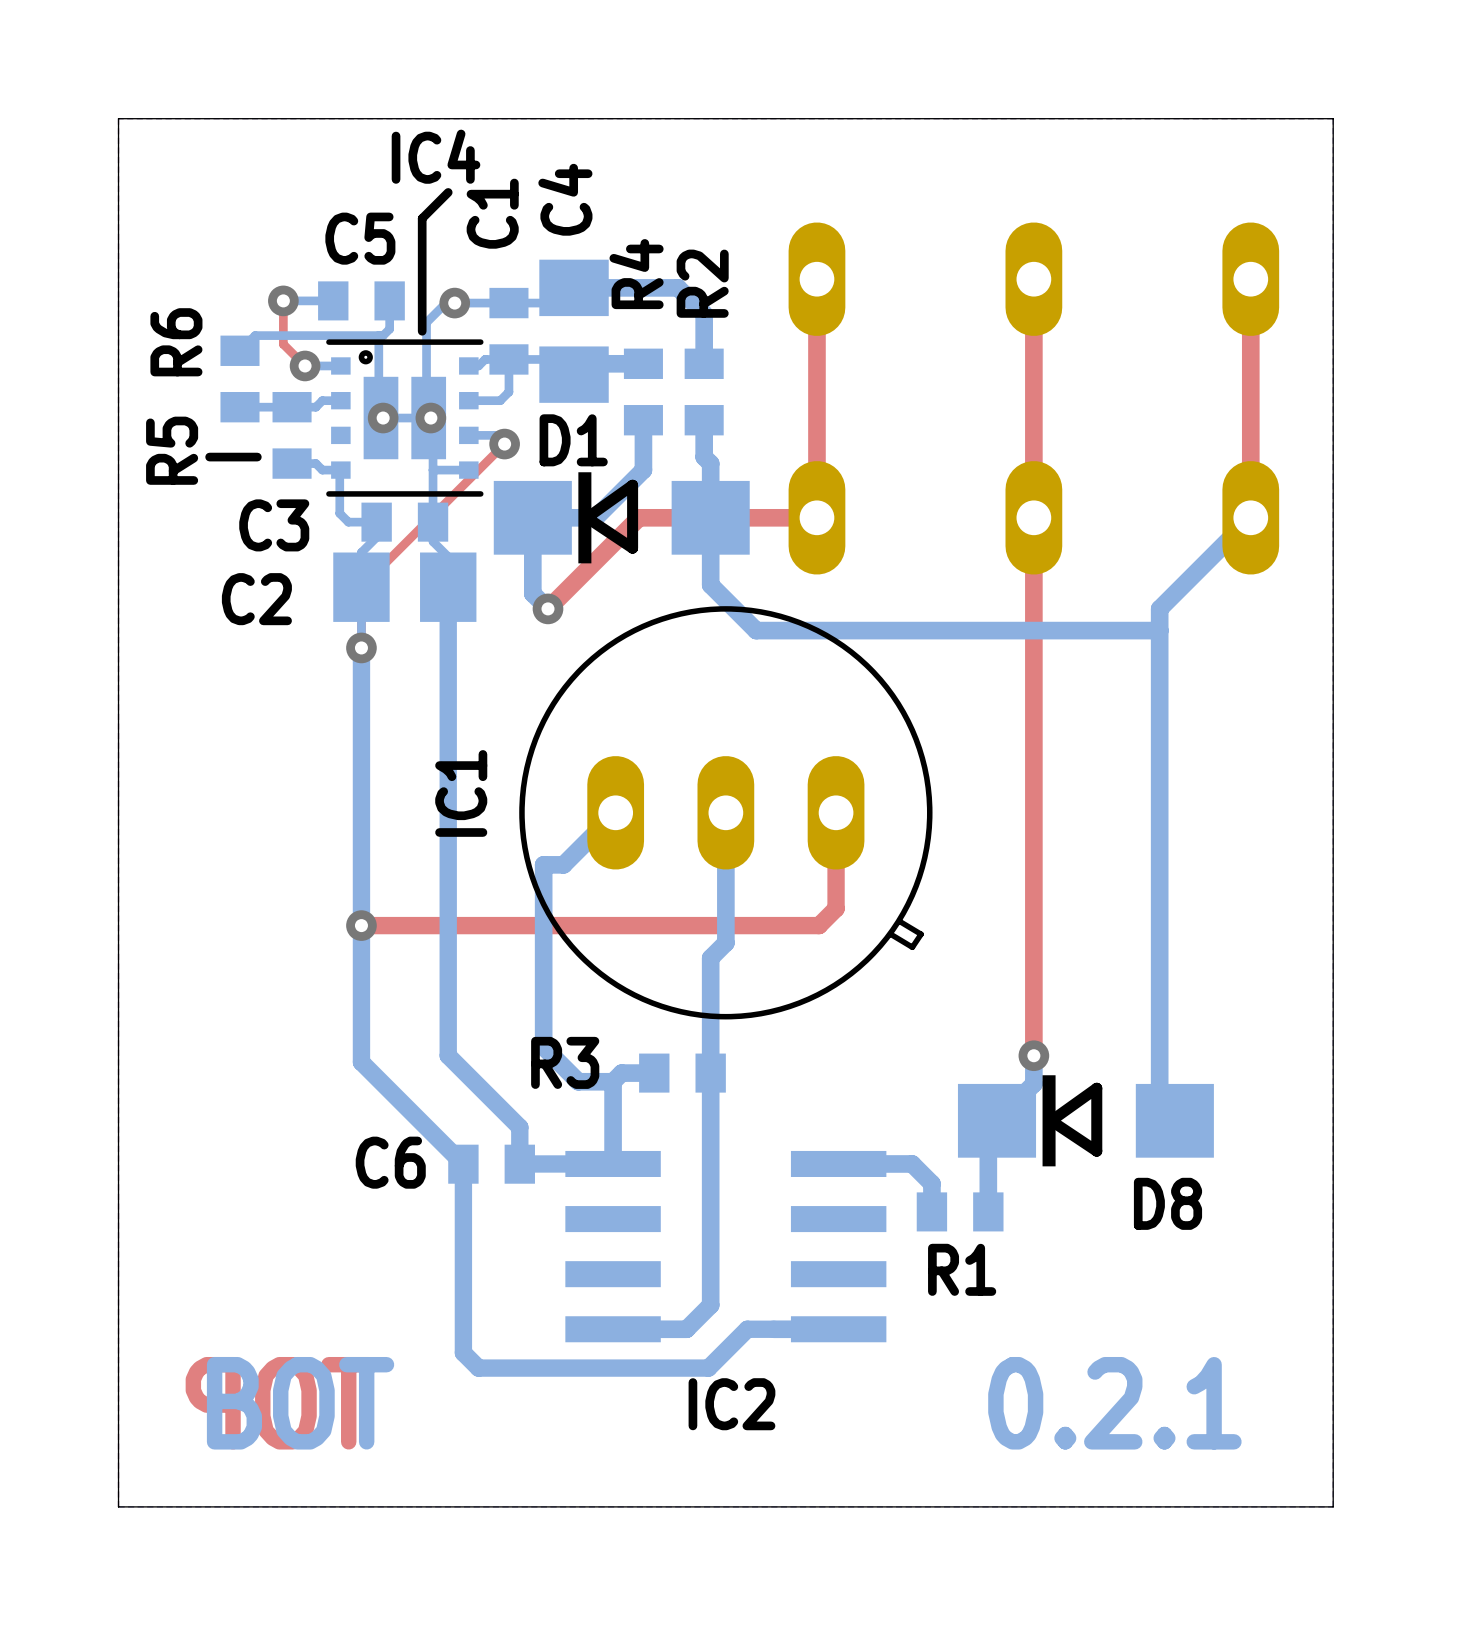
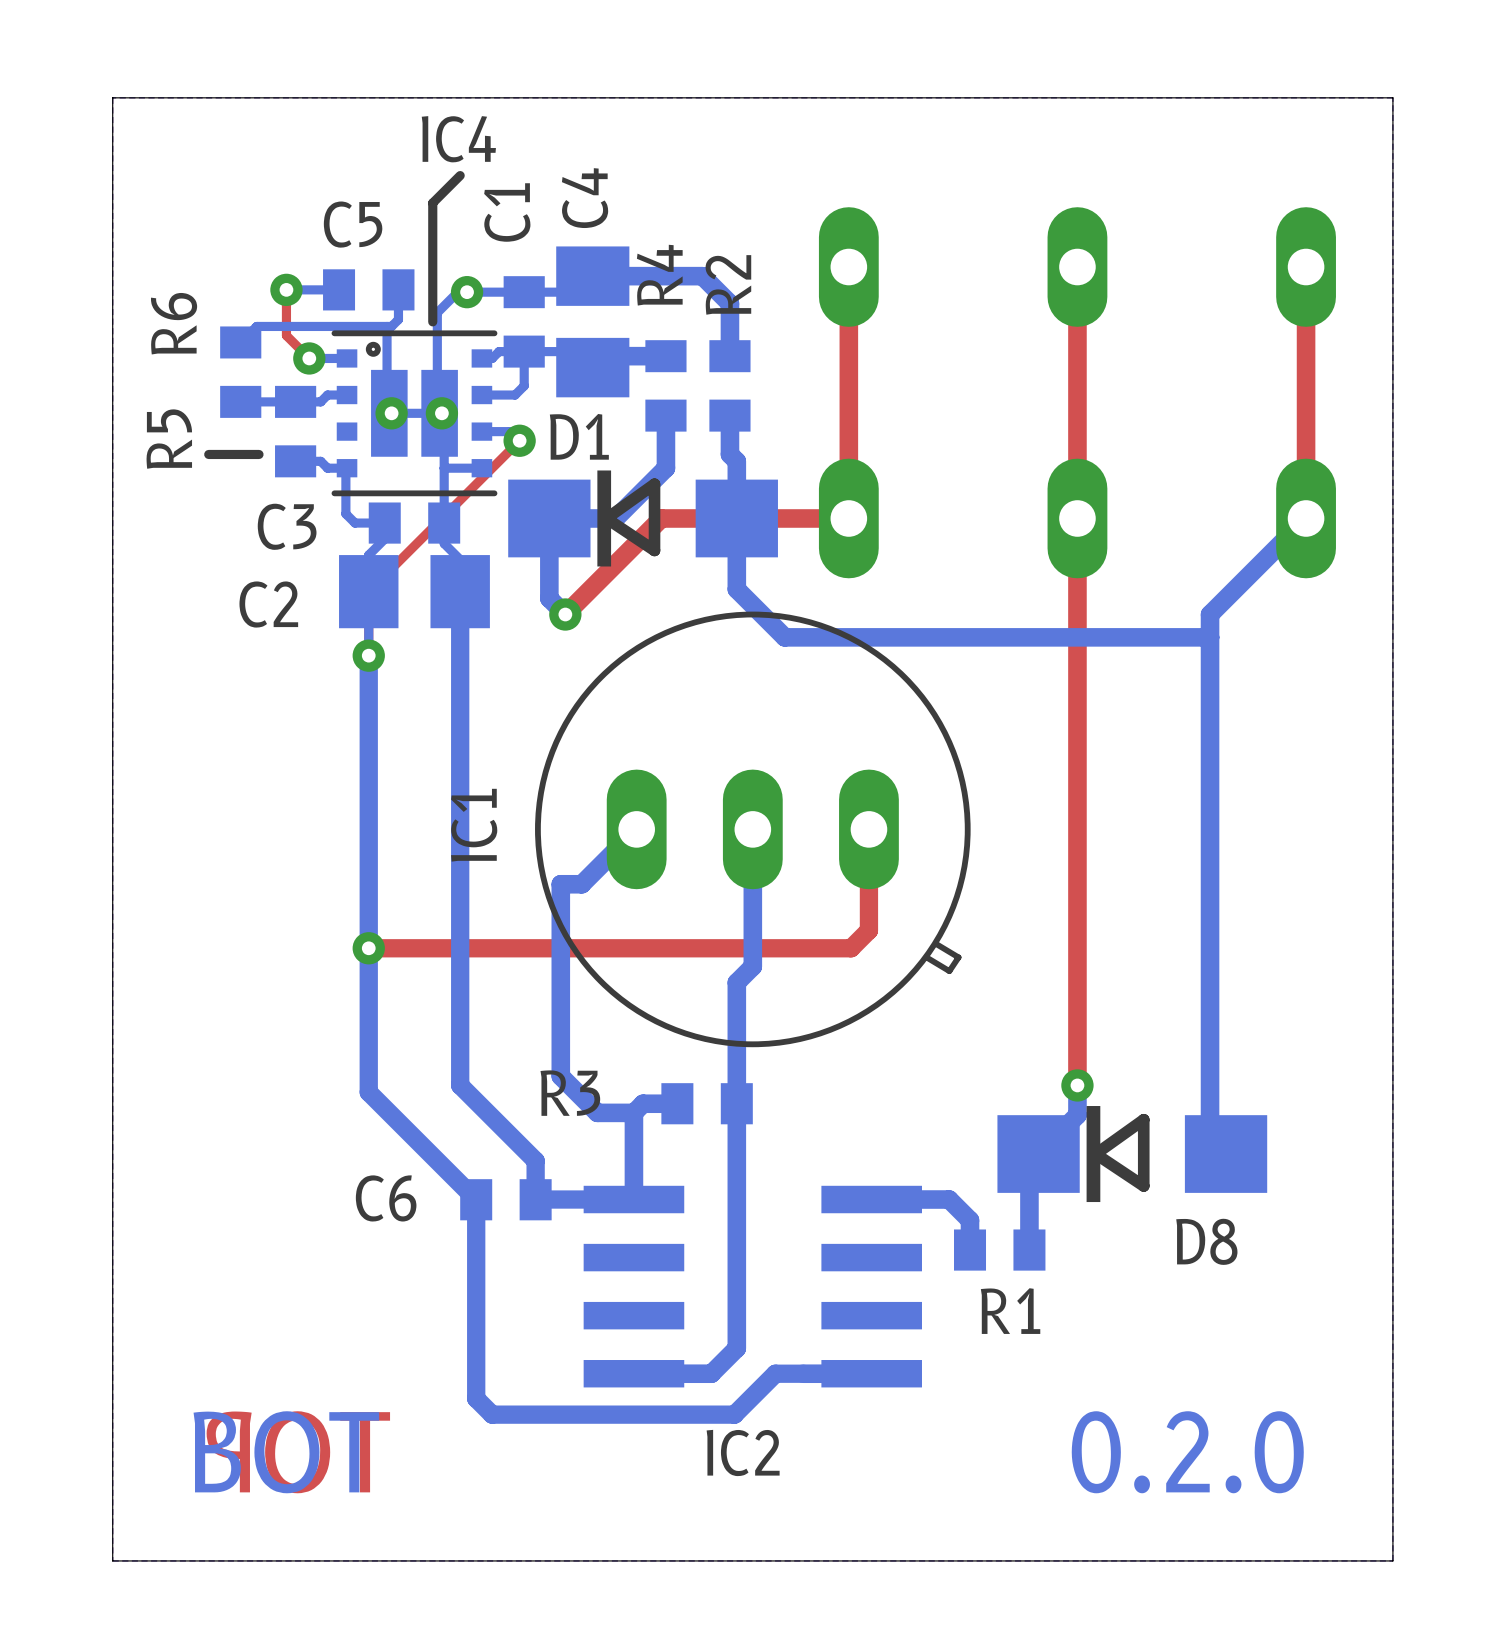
text: 0.2.1 (1114, 1403) -> 0.2.0 (1187, 1452)

